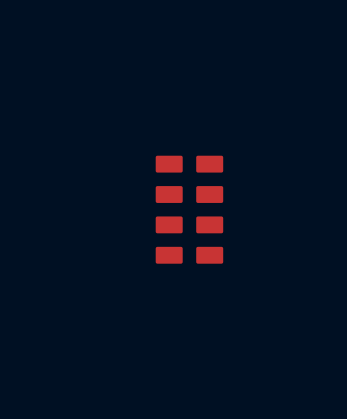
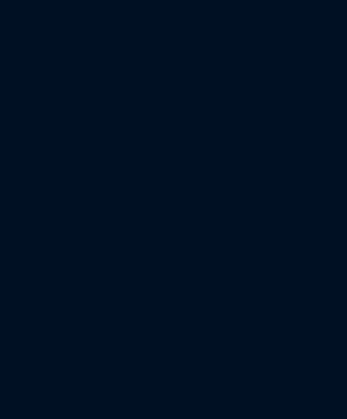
part: (189, 209) -> none

